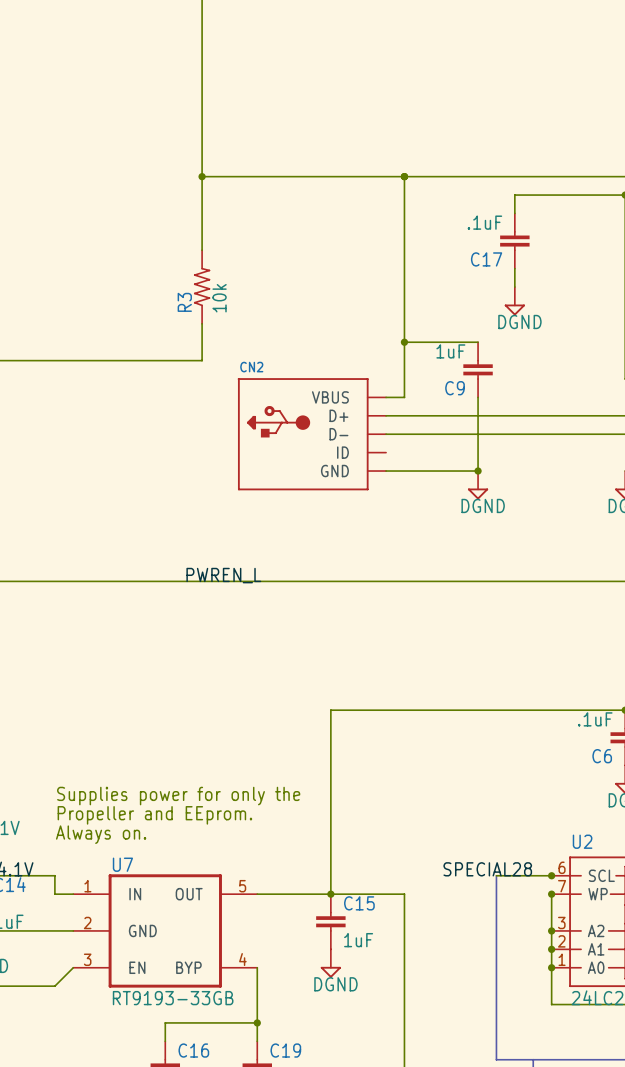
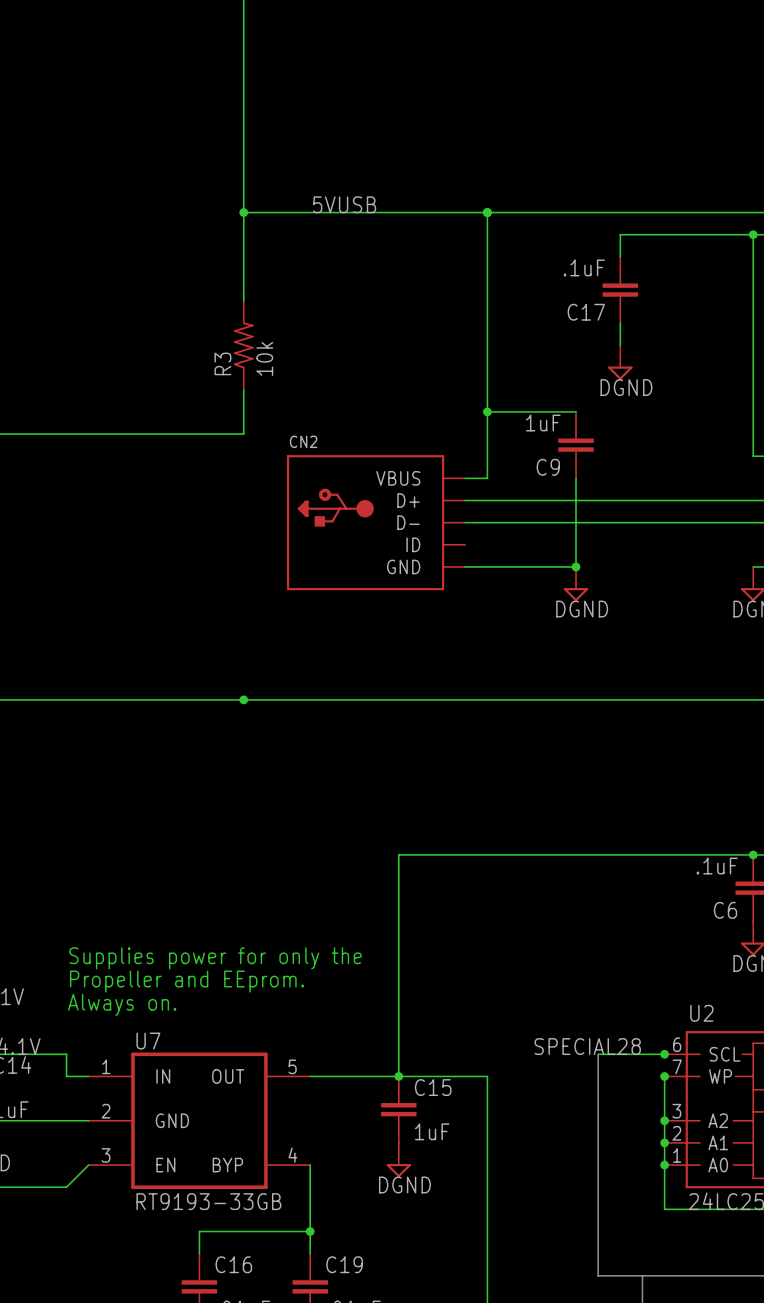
label: none -> 5VUSB (344, 204)
label: PWREN_L (223, 575) -> none
junction: none -> (243, 699)

